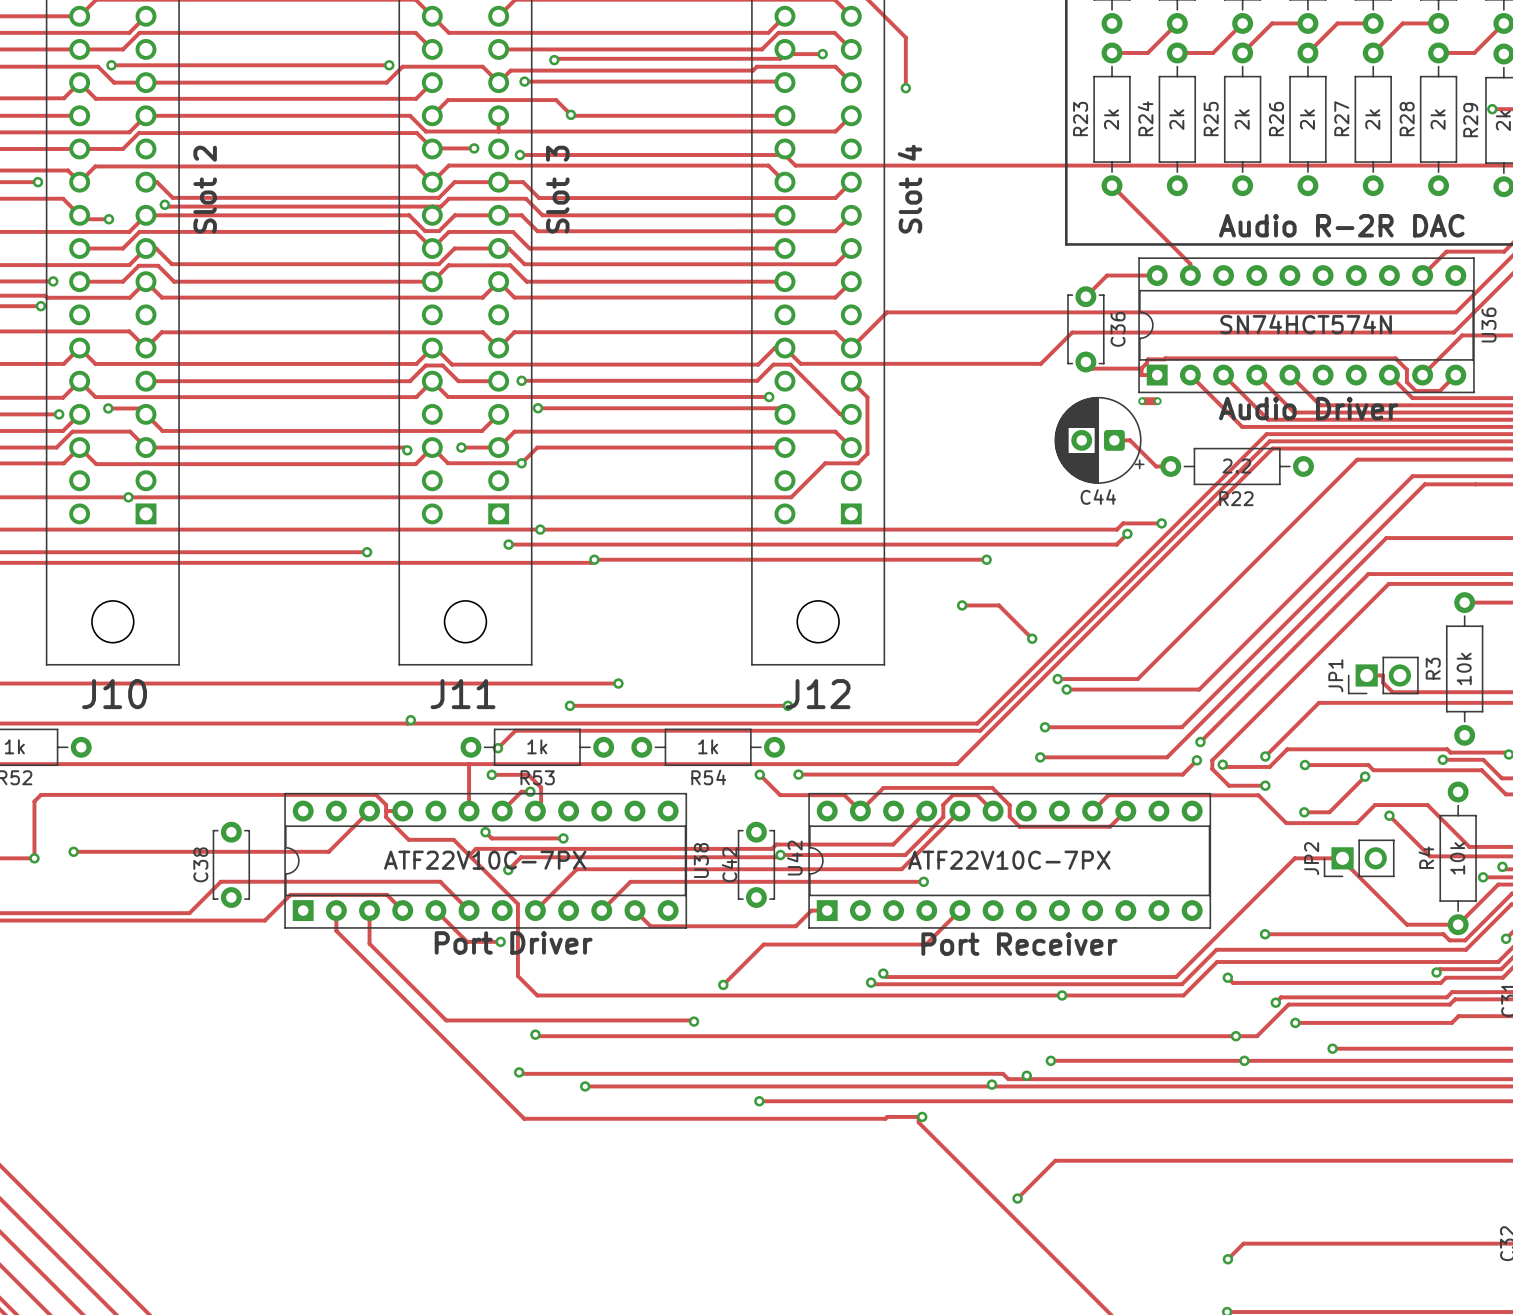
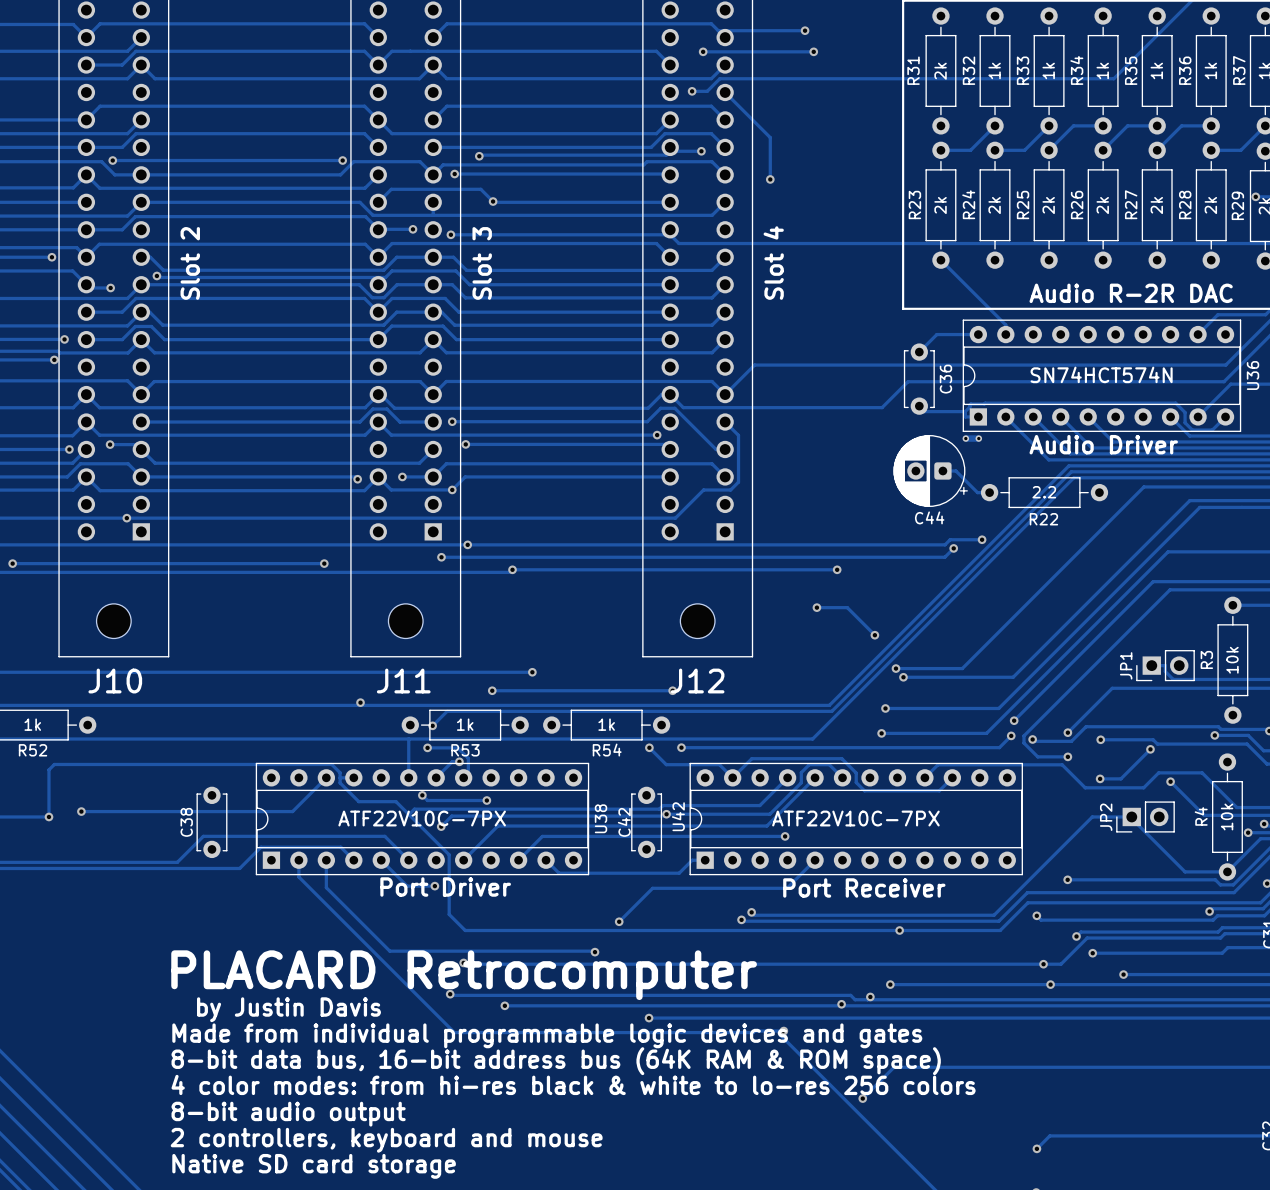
text: none -> PLACARD Retrocomputer (464, 975)
text: none -> by Justin Davis (288, 1009)
text: none -> Made from individual programmable logic devices and gates (547, 1035)
text: none -> 8-bit data bus, 16-bit address bus (64K RAM & ROM space) (556, 1061)
text: none -> 4 color modes: from hi-res black & white to lo-res 256 colors (573, 1084)
text: none -> 8-bit audio output (288, 1114)
text: none -> 2 controllers, keyboard and mouse (386, 1140)
text: none -> Native SD card storage (314, 1166)

